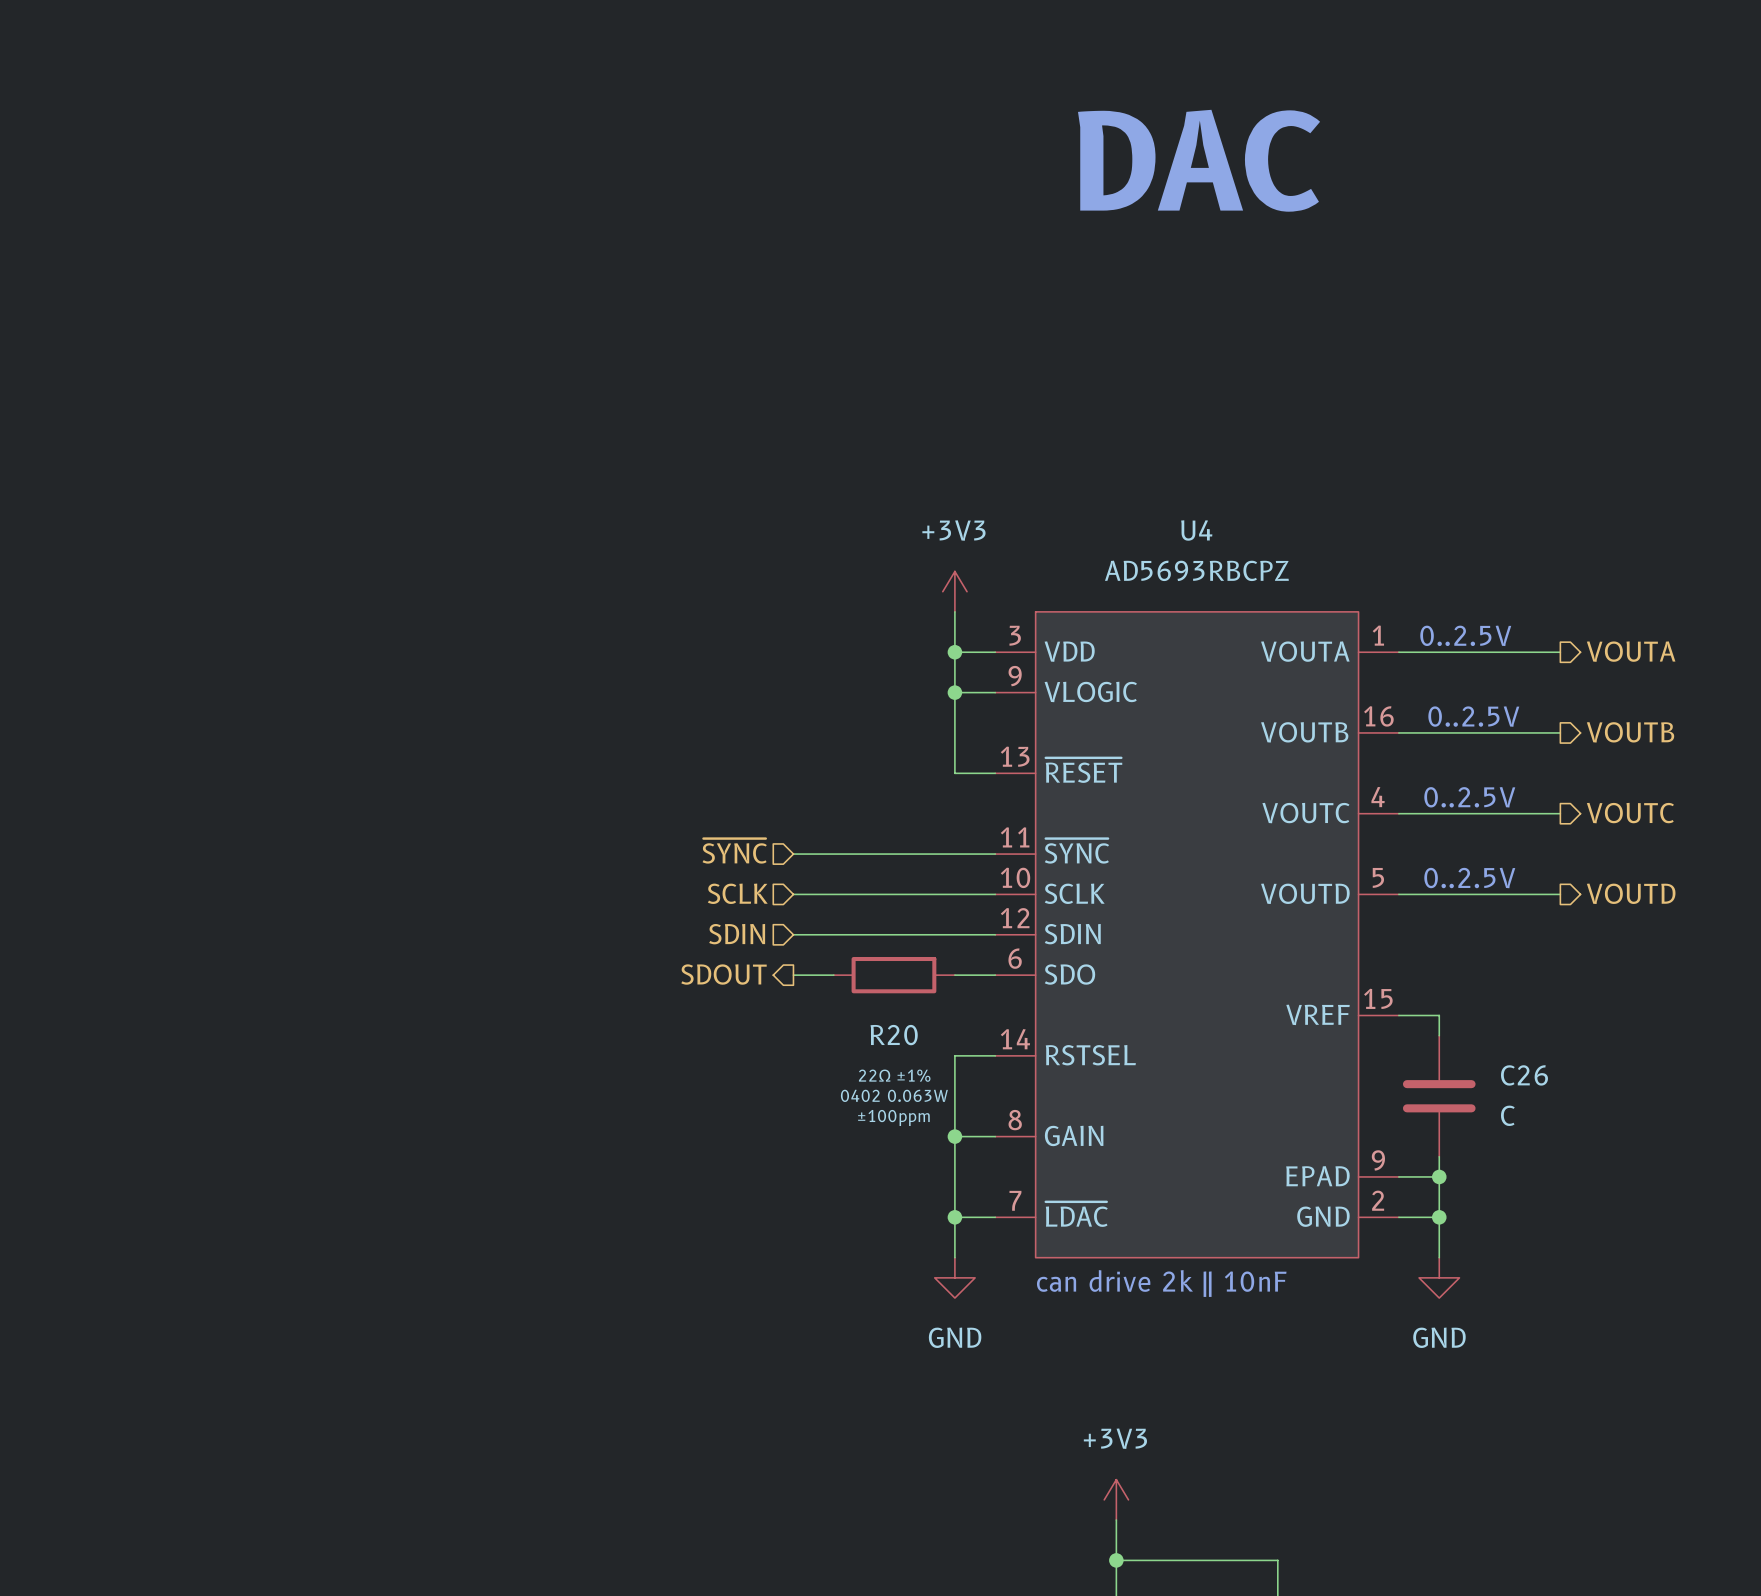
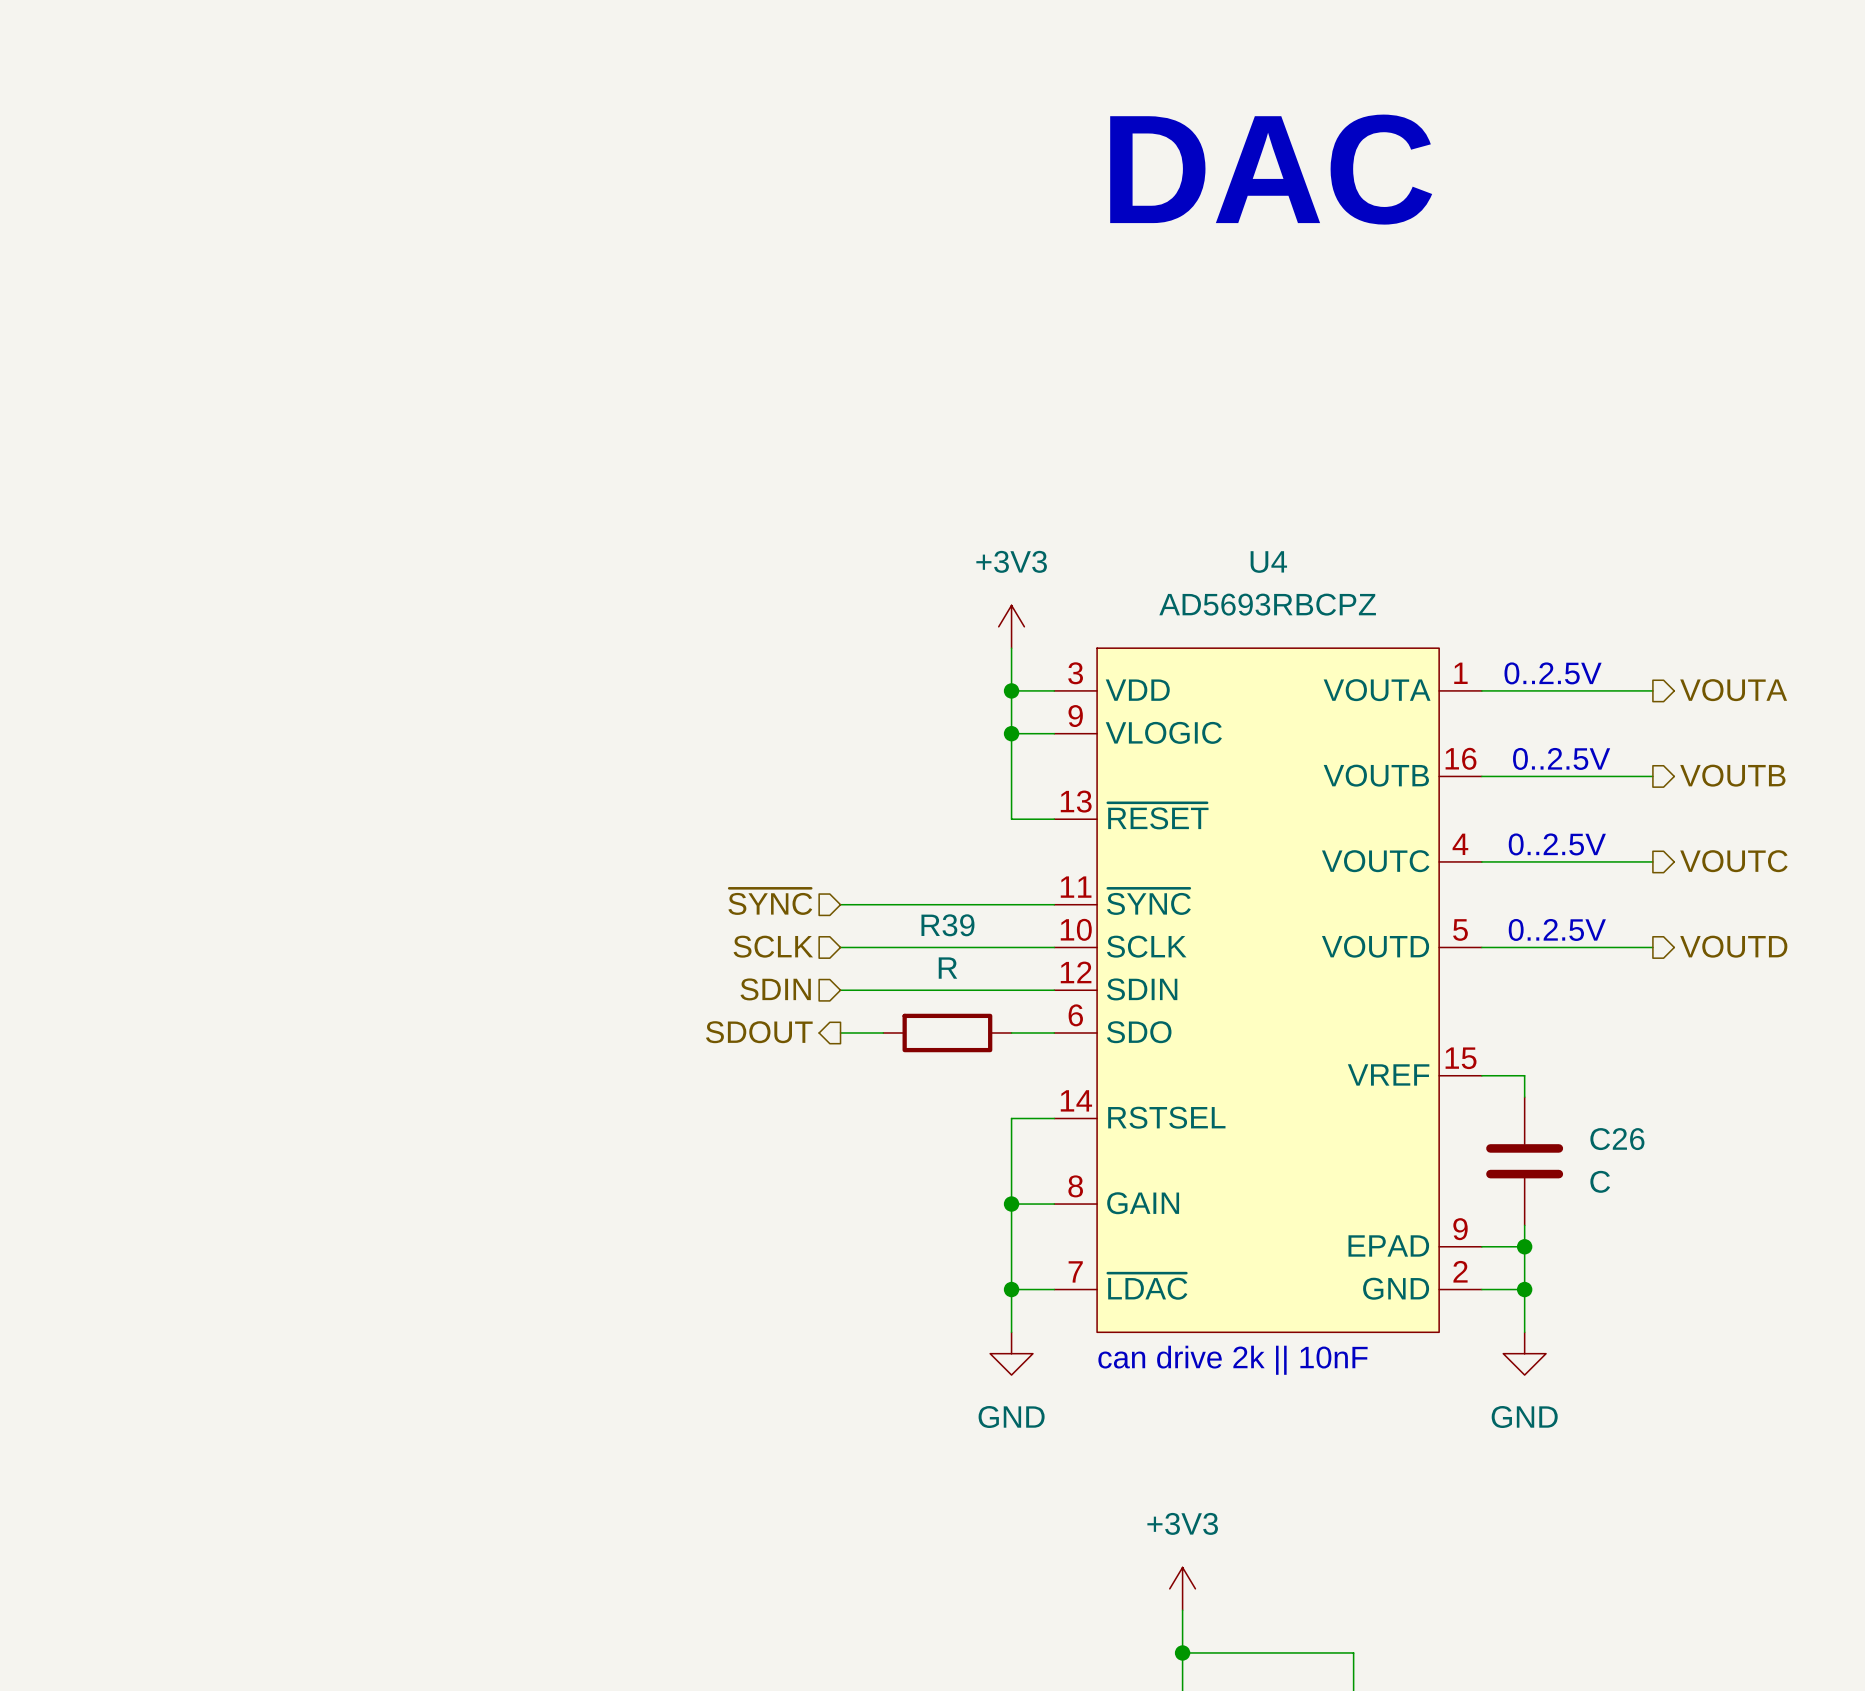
R20 value: none -> R (947, 968)
R20 name: R20 (894, 1035) -> R39 (947, 925)
R20 text: 22Ω ±1% (894, 1075) -> none
R20 text: 0402 0.063W (894, 1095) -> none
R20 text: ±100ppm (893, 1117) -> none

